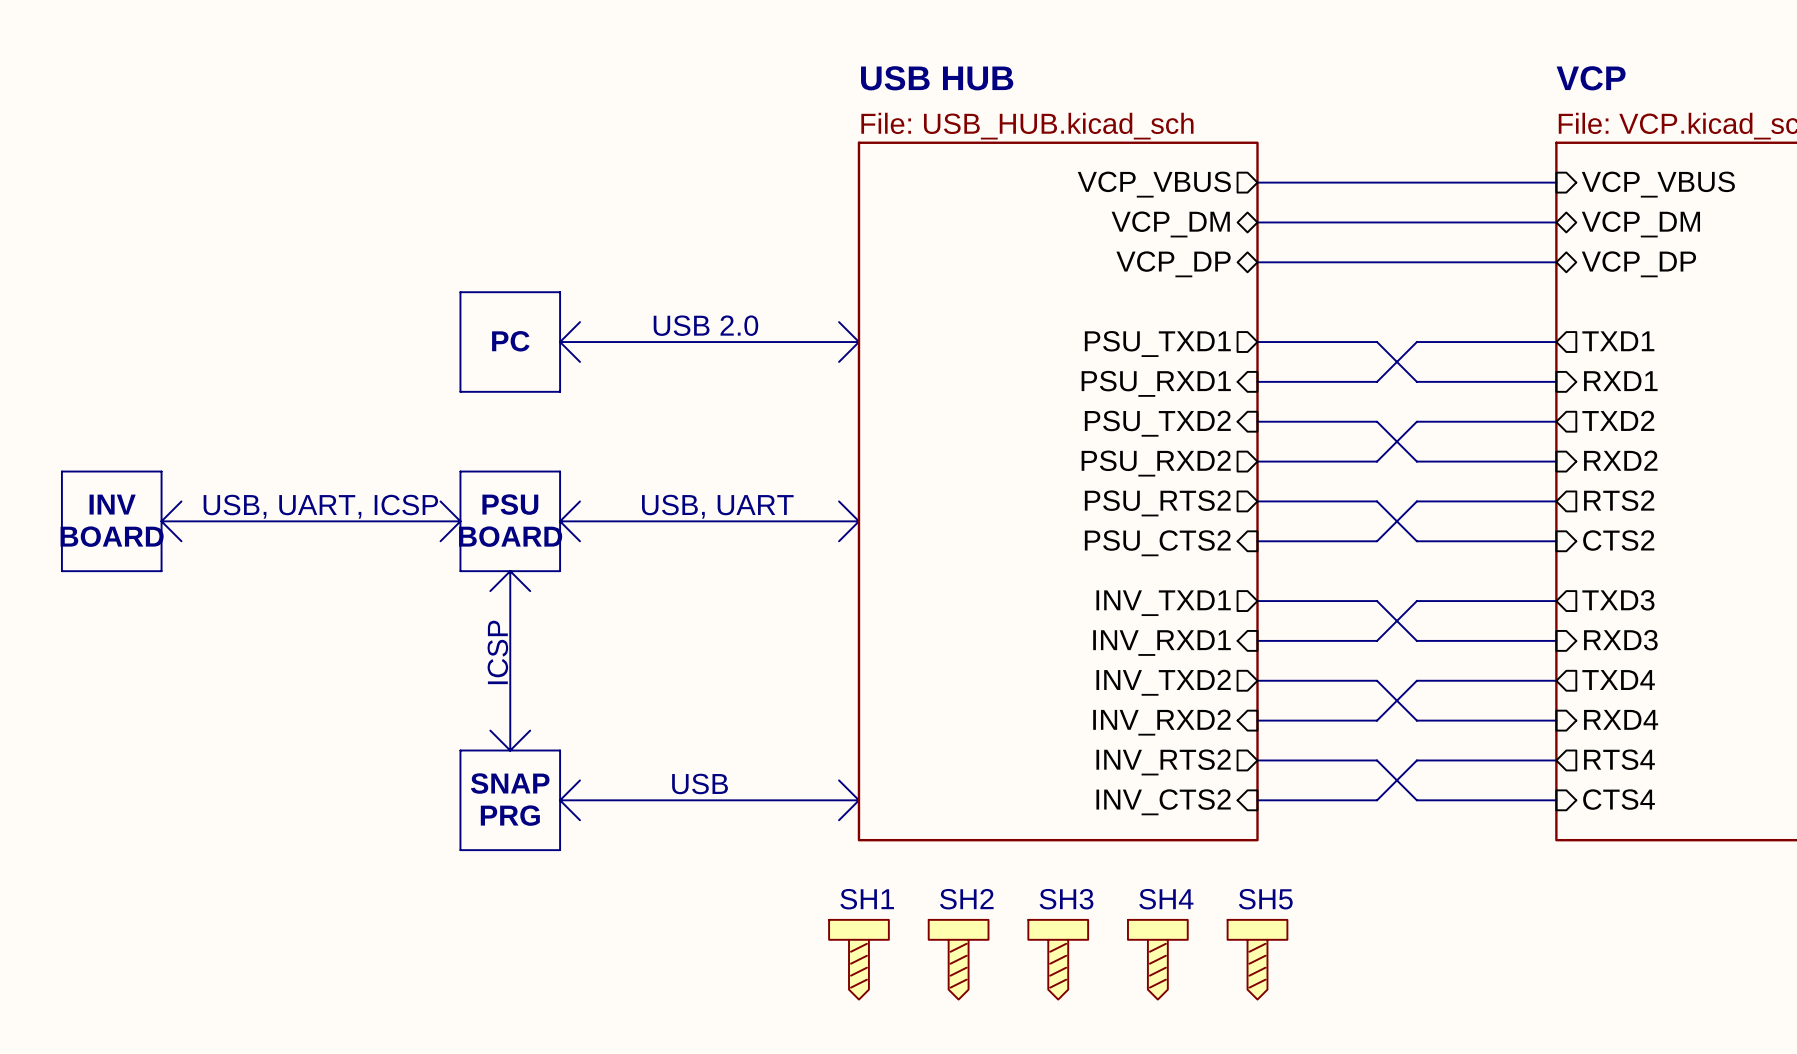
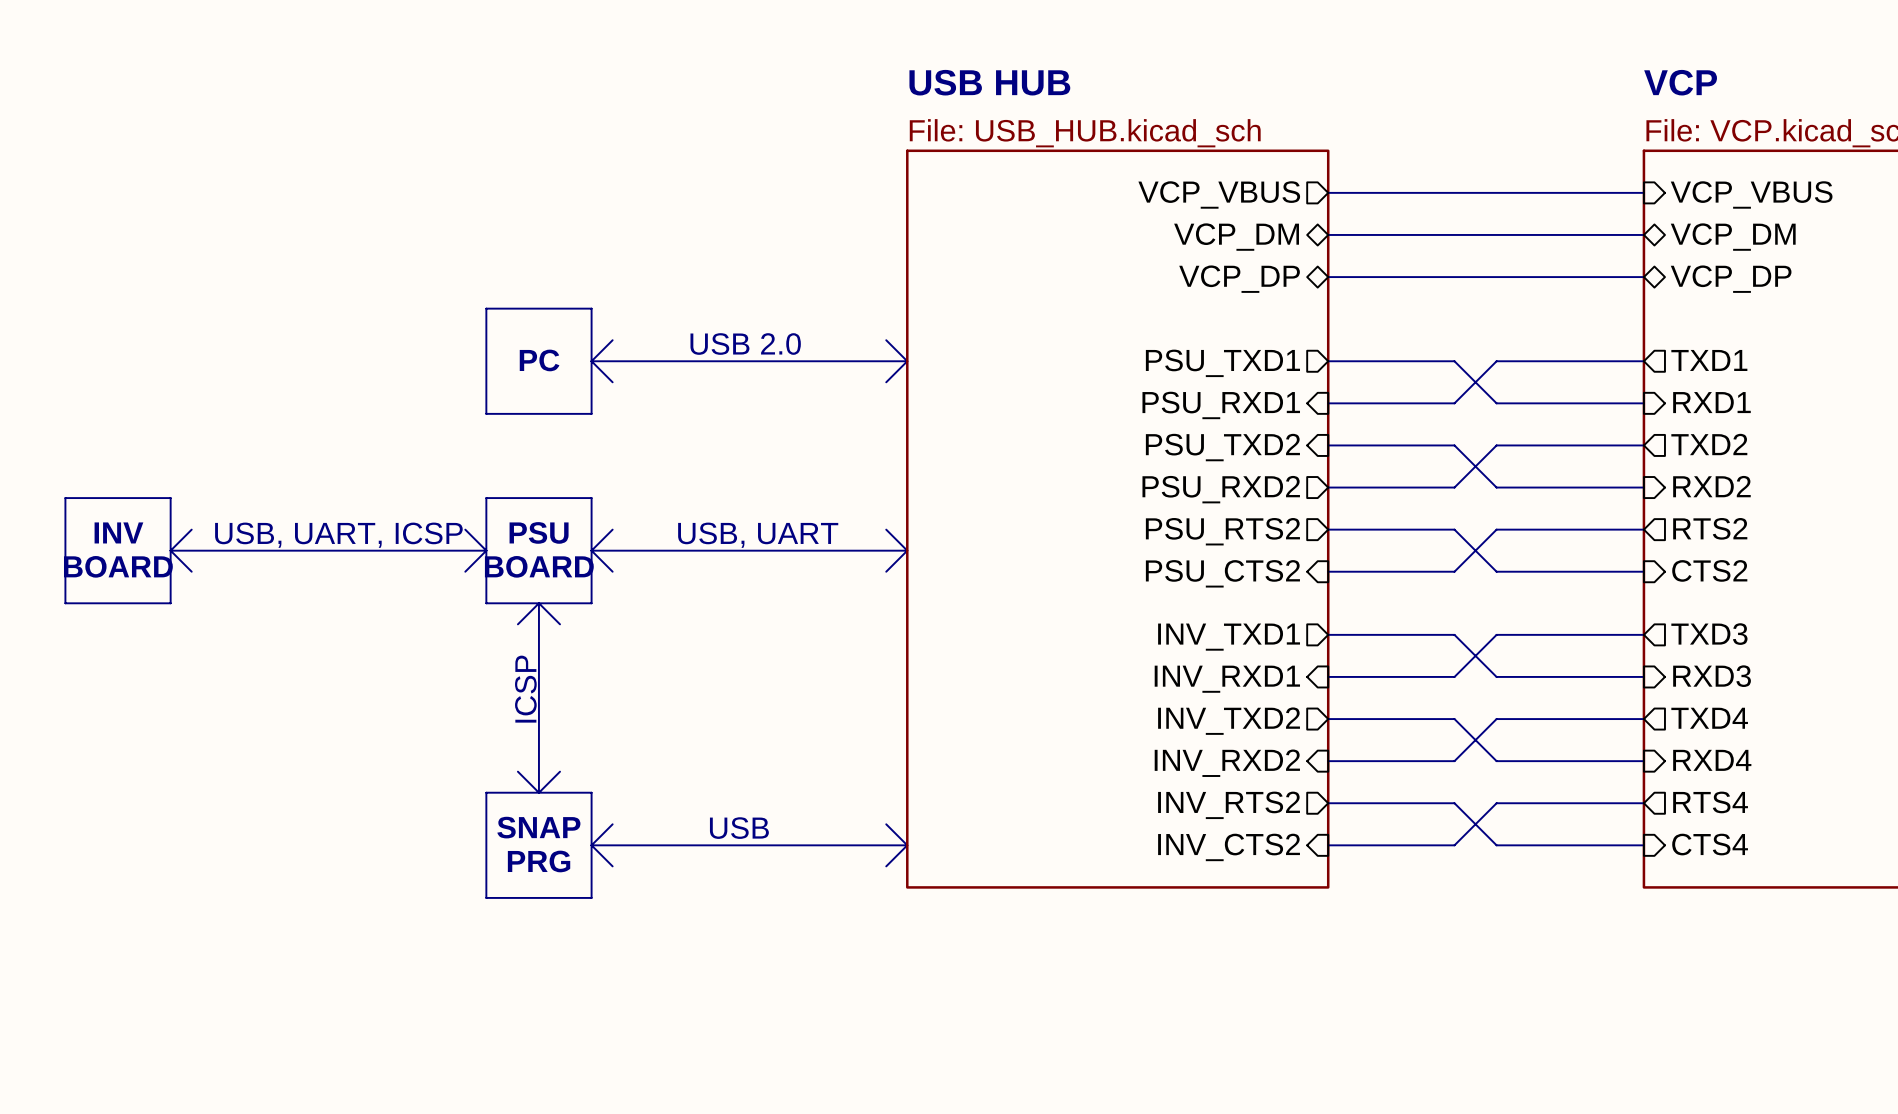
SH1: (858, 959) -> none
SH2: (958, 959) -> none
SH3: (1058, 959) -> none
SH4: (1157, 959) -> none
SH5: (1257, 959) -> none

